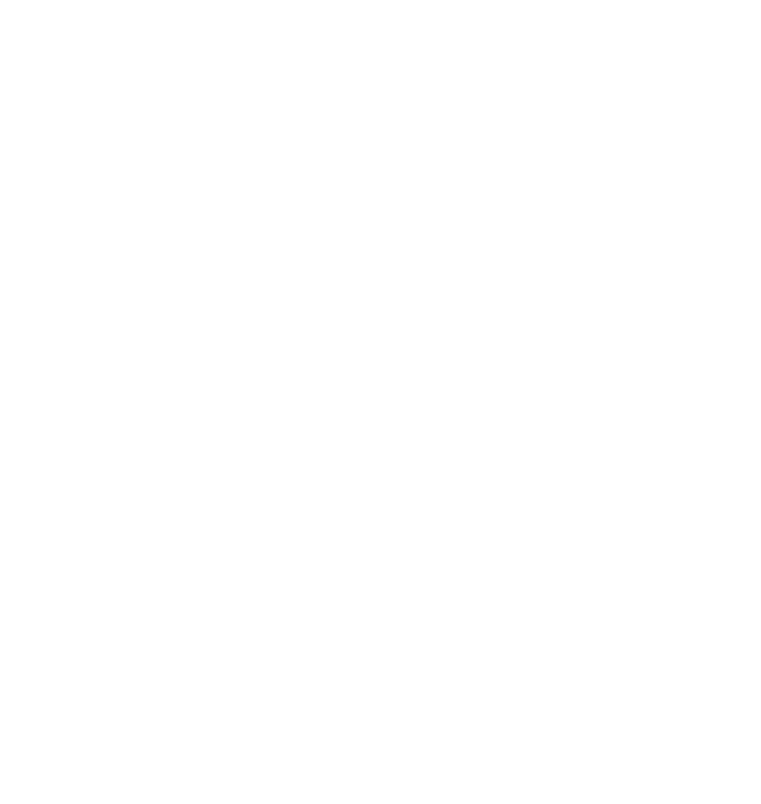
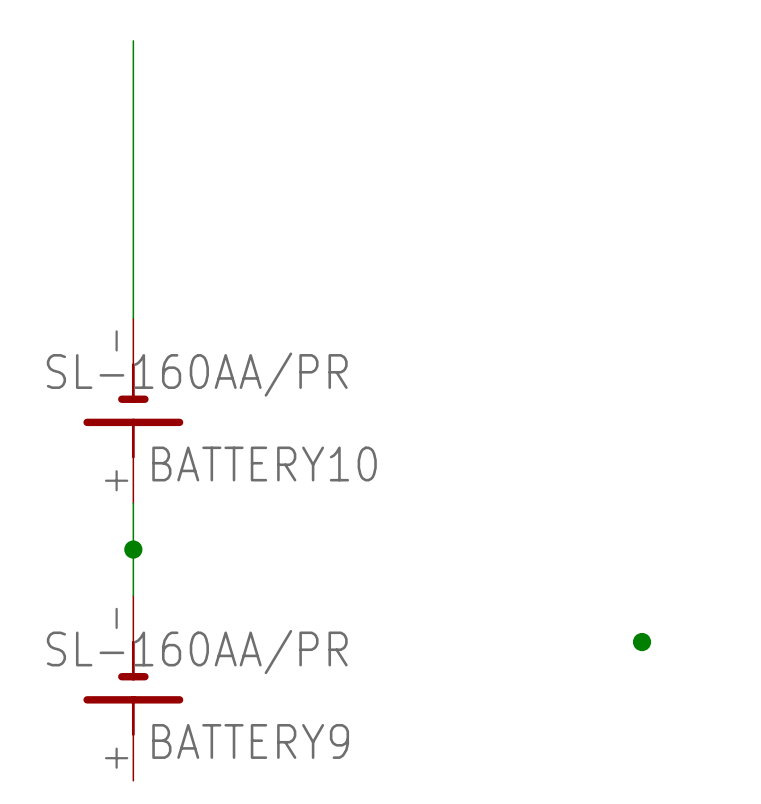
wire: none -> (133, 40) (133, 318)
BATTERY10: none -> SL-160AA/PR (133, 410)
wire: none -> (133, 503) (133, 595)
junction: none -> (133, 549)
junction: none -> (642, 642)
BATTERY9: none -> SL-160AA/PR (133, 688)

